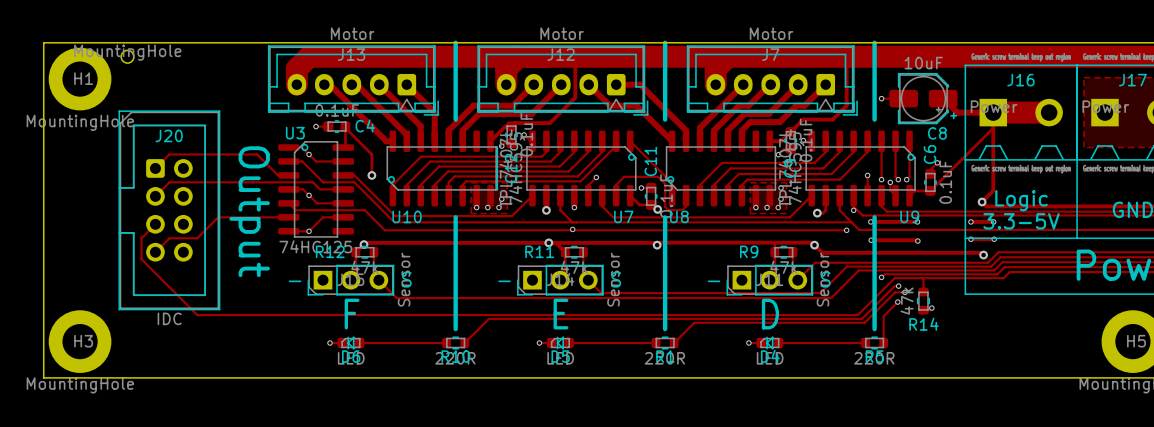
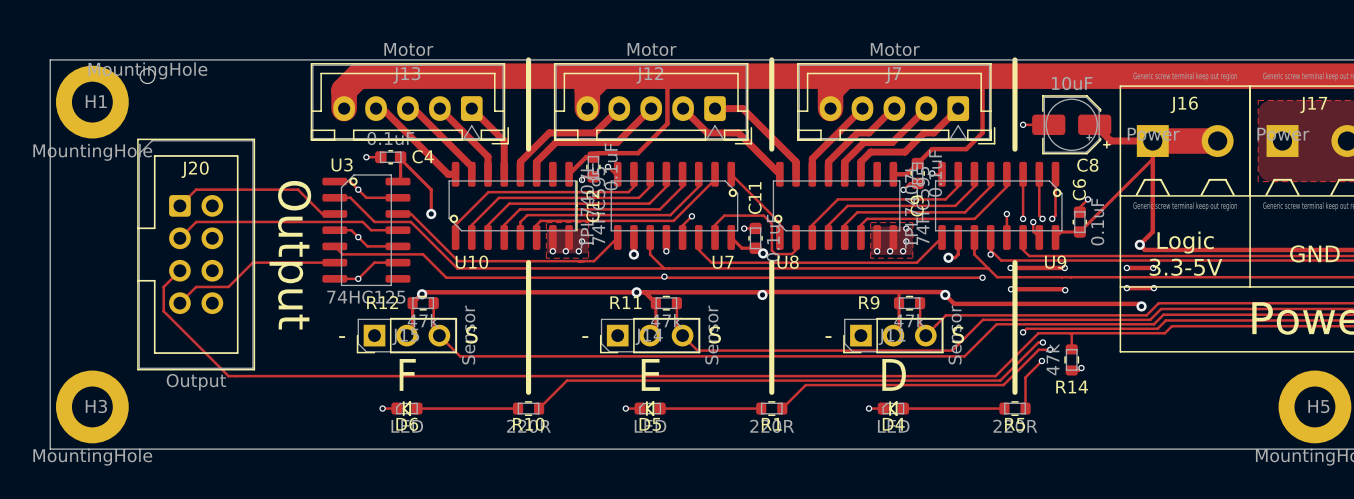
J20 value: IDC (169, 318) -> Output (196, 382)

